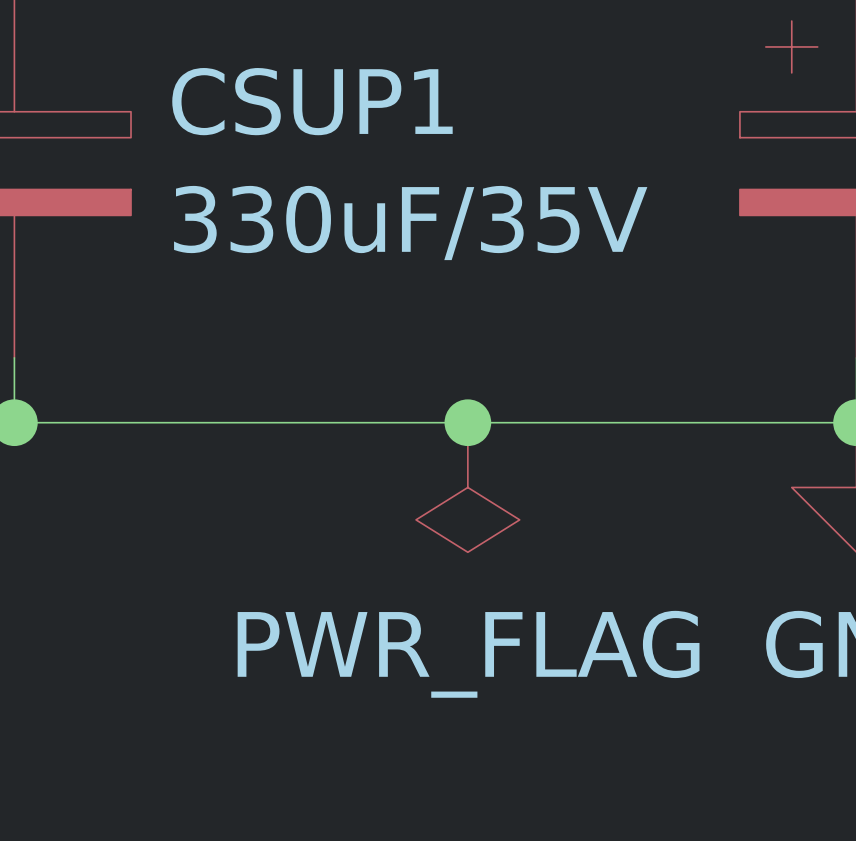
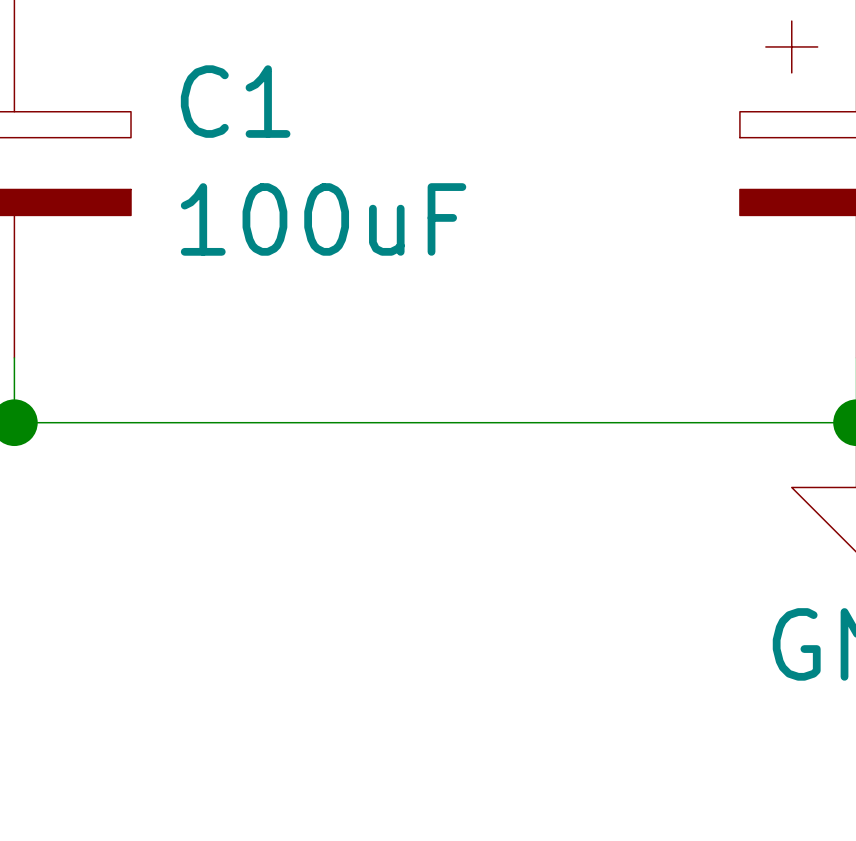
CSUP1 name: CSUP1 (312, 101) -> C1 (235, 101)
CSUP1 value: 330uF/35V (410, 223) -> 100uF (323, 219)
junction: (467, 422) -> none
power symbol: PWR_FLAG (467, 487) -> none

